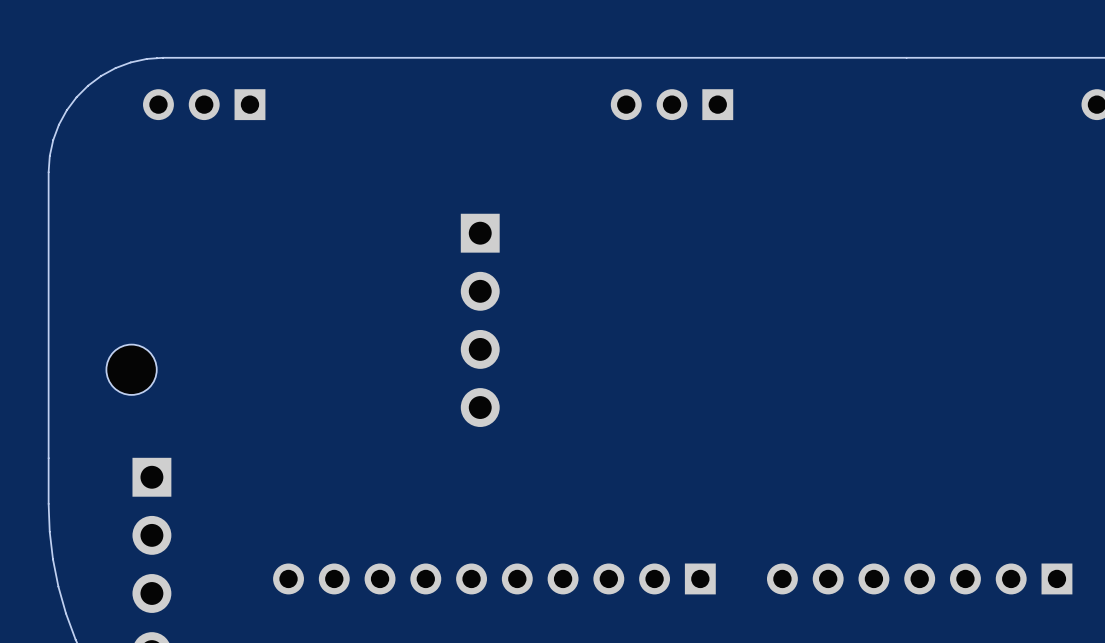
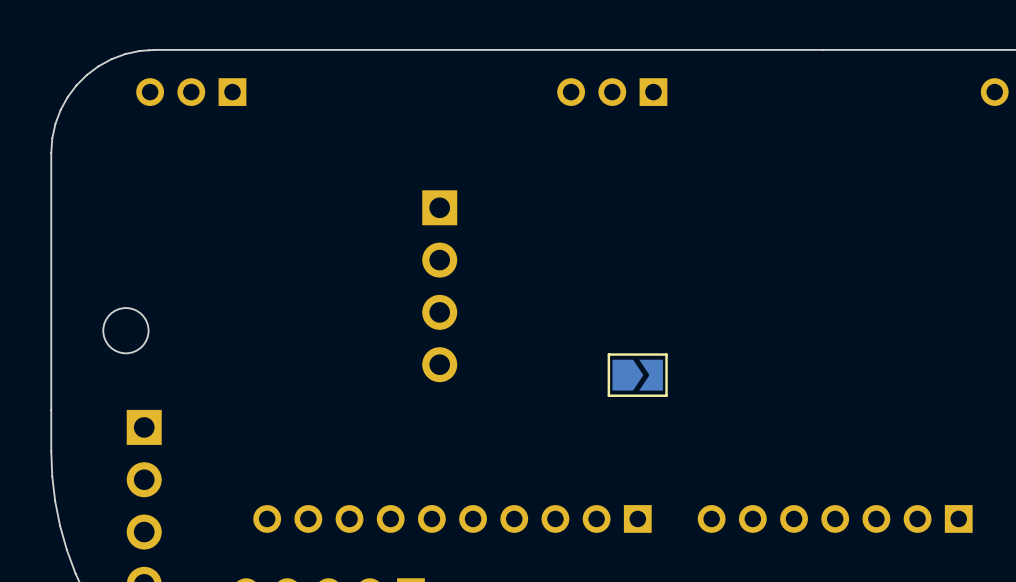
part: none -> (637, 375)

